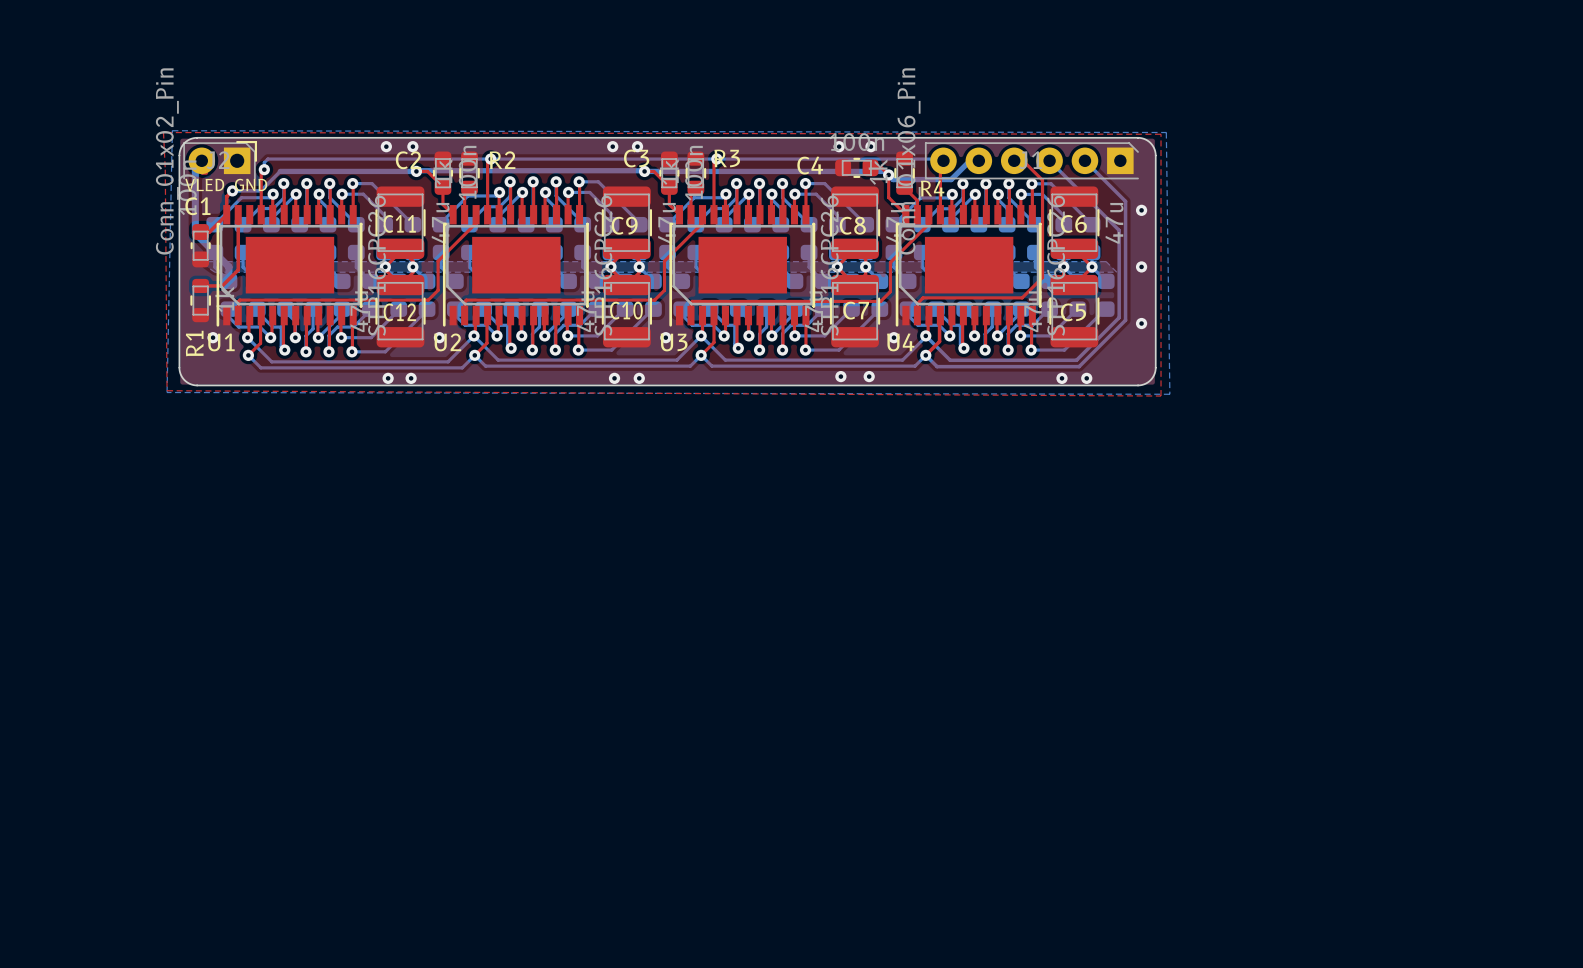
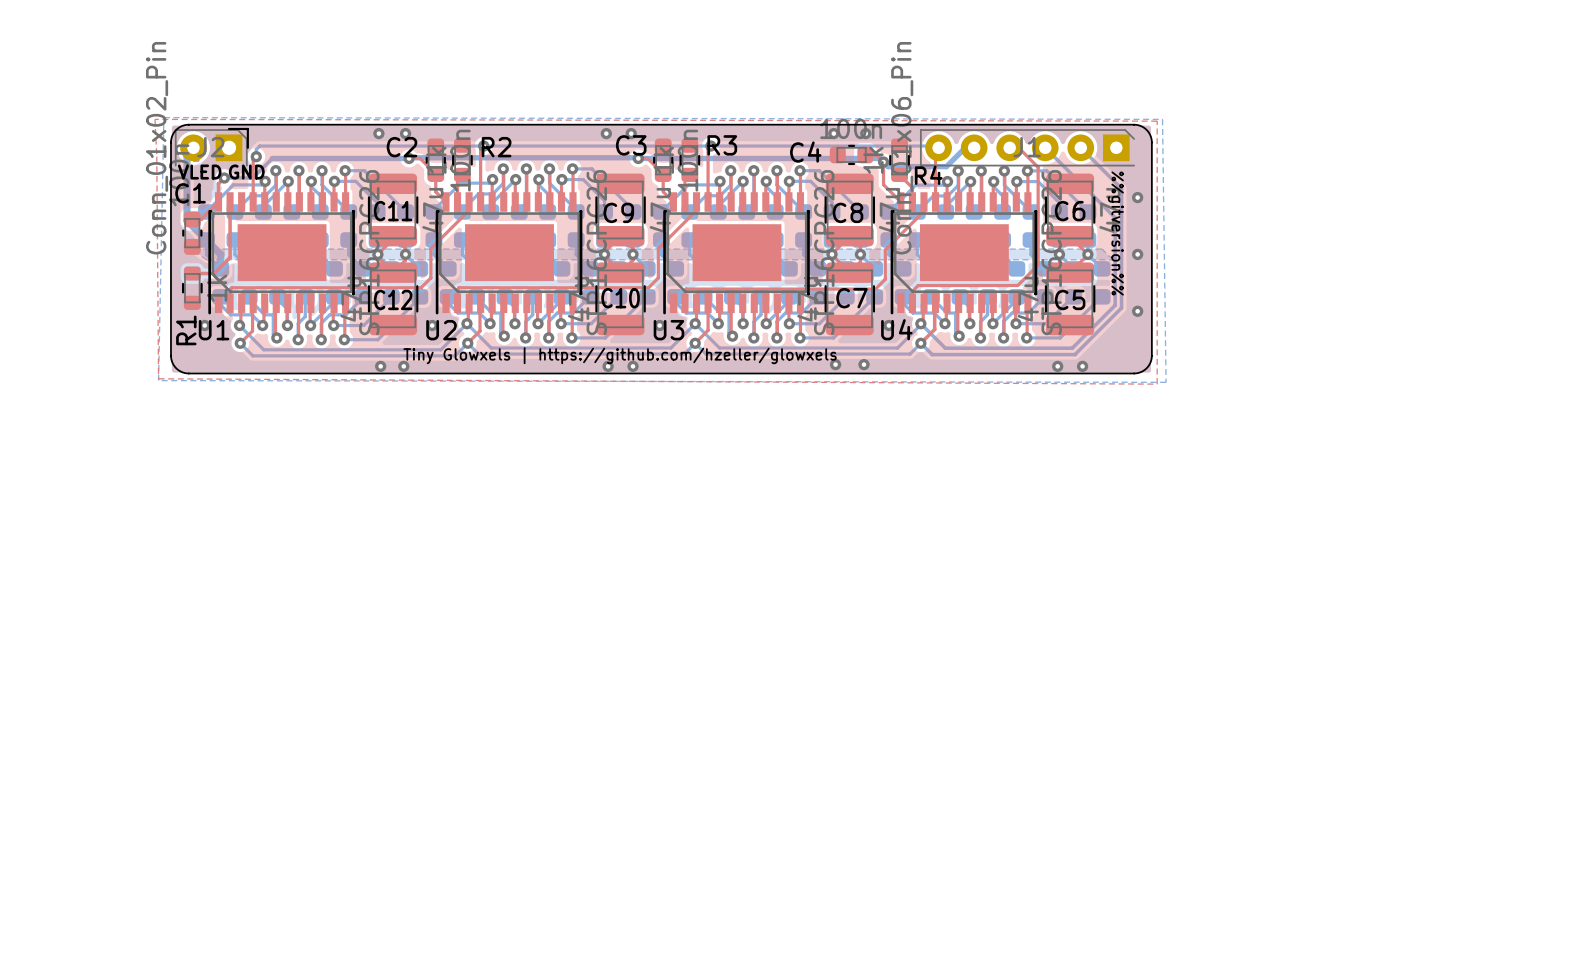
text: none -> %%gitversion%% (1115, 233)
text: none -> Tiny Glowxels | https://github.com/hzeller/glowxels (620, 355)

